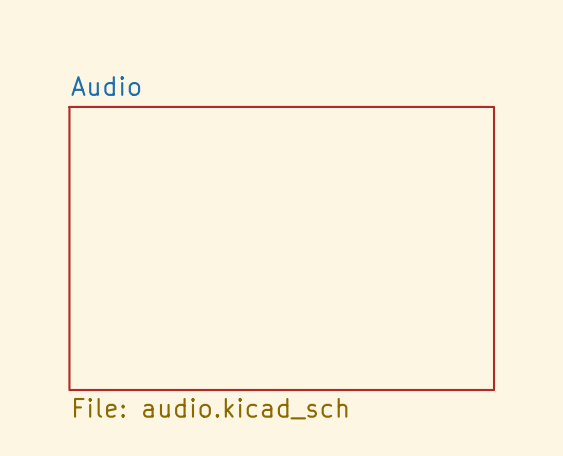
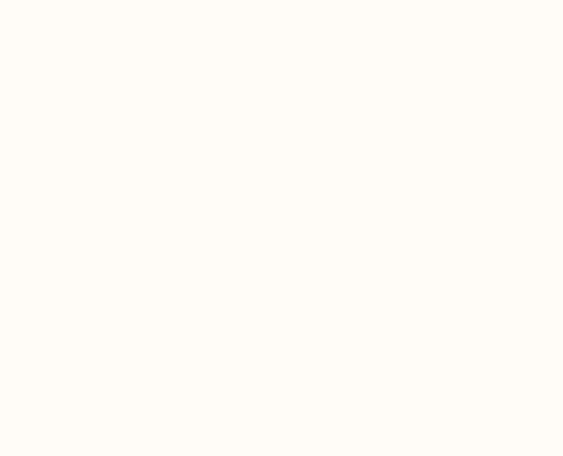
sheet Audio: File: audio.kicad_sch (281, 248) -> none

